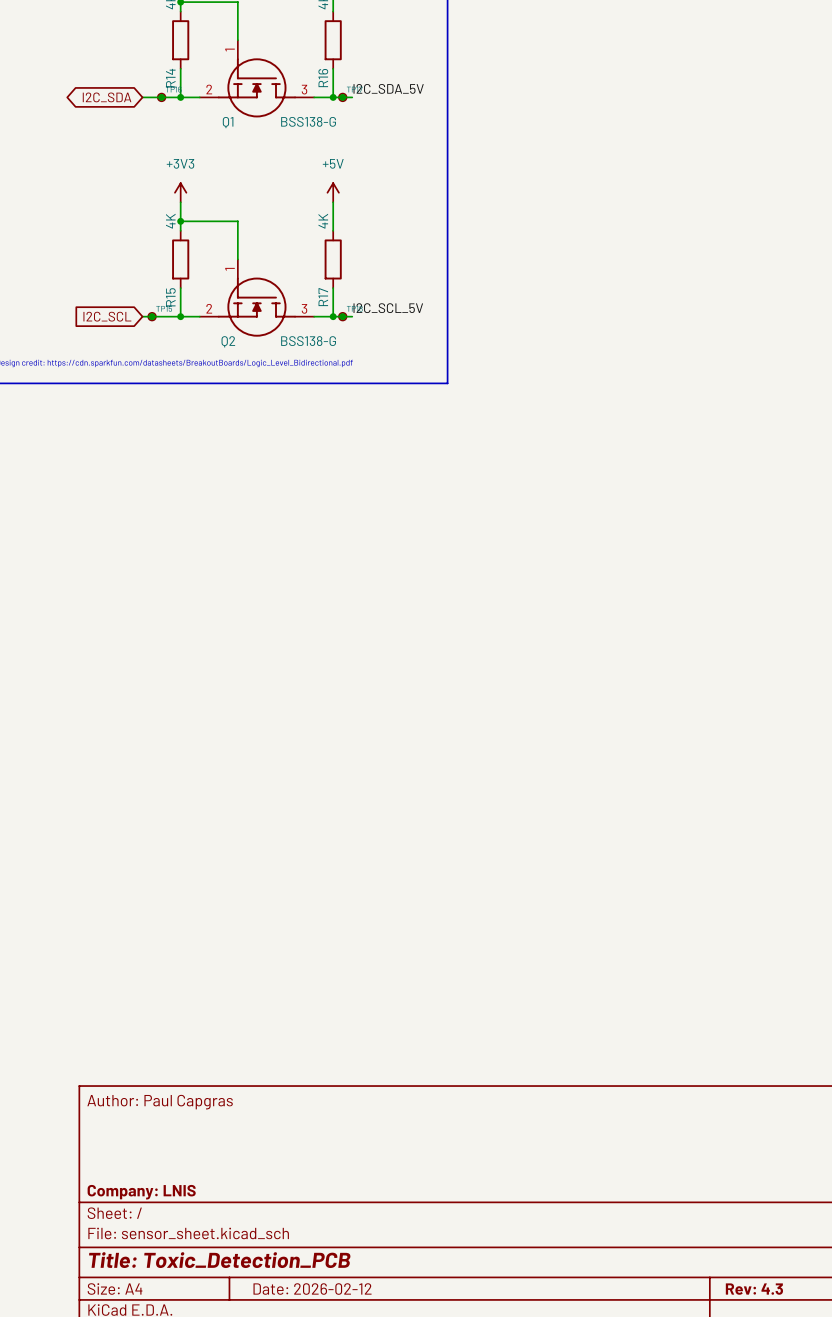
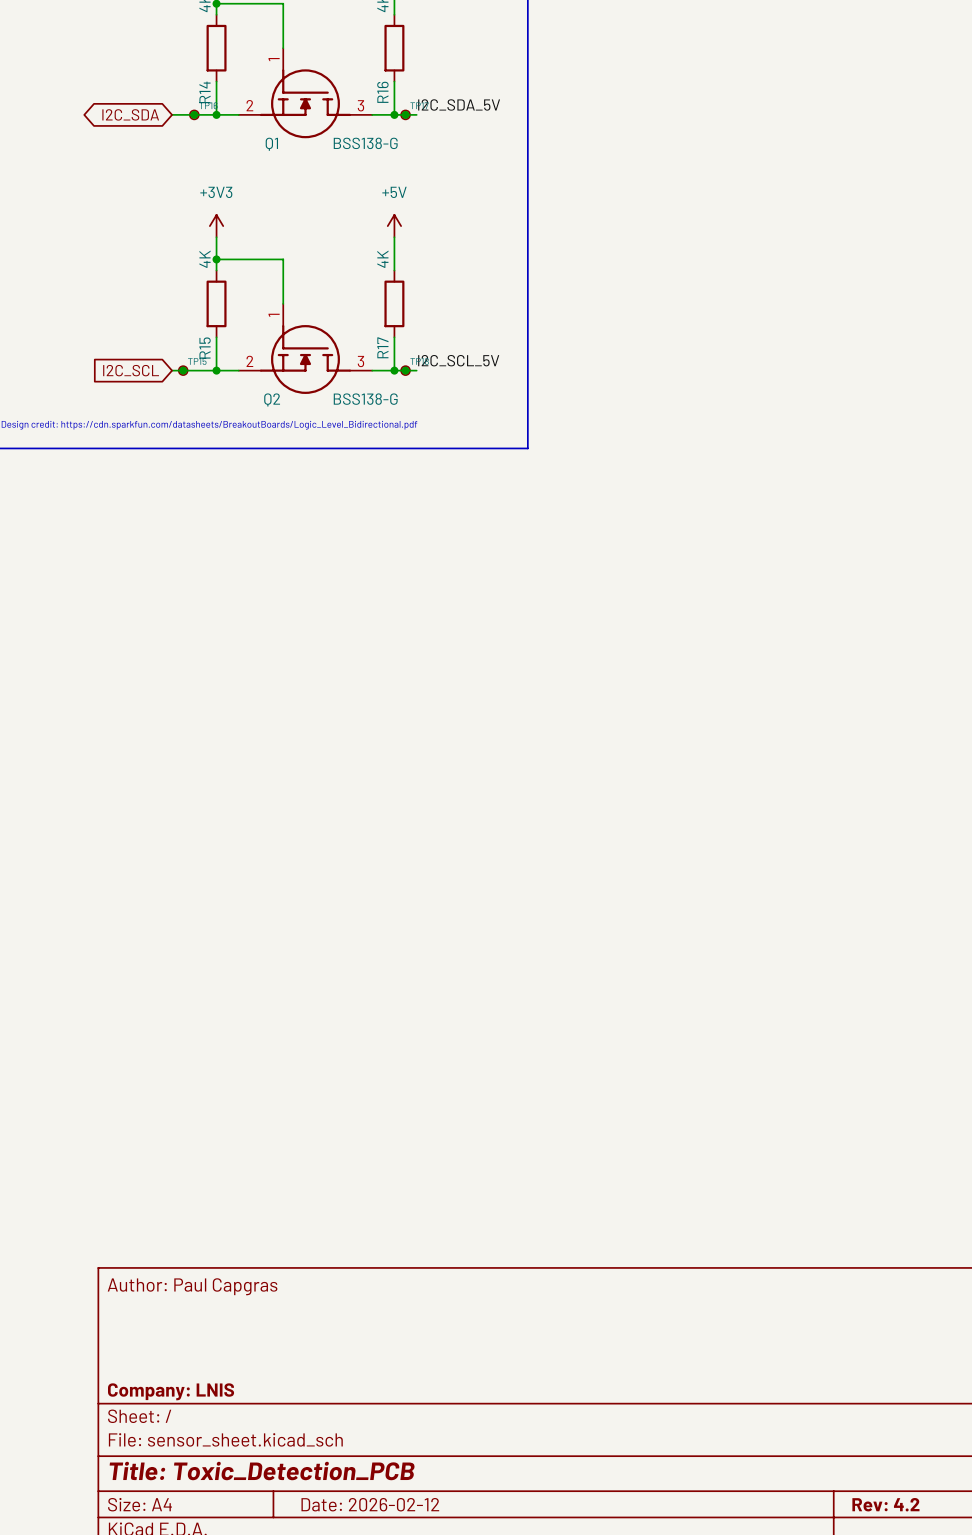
title block: Rev: 4.3 (754, 1289) -> Rev: 4.2 (885, 1504)

